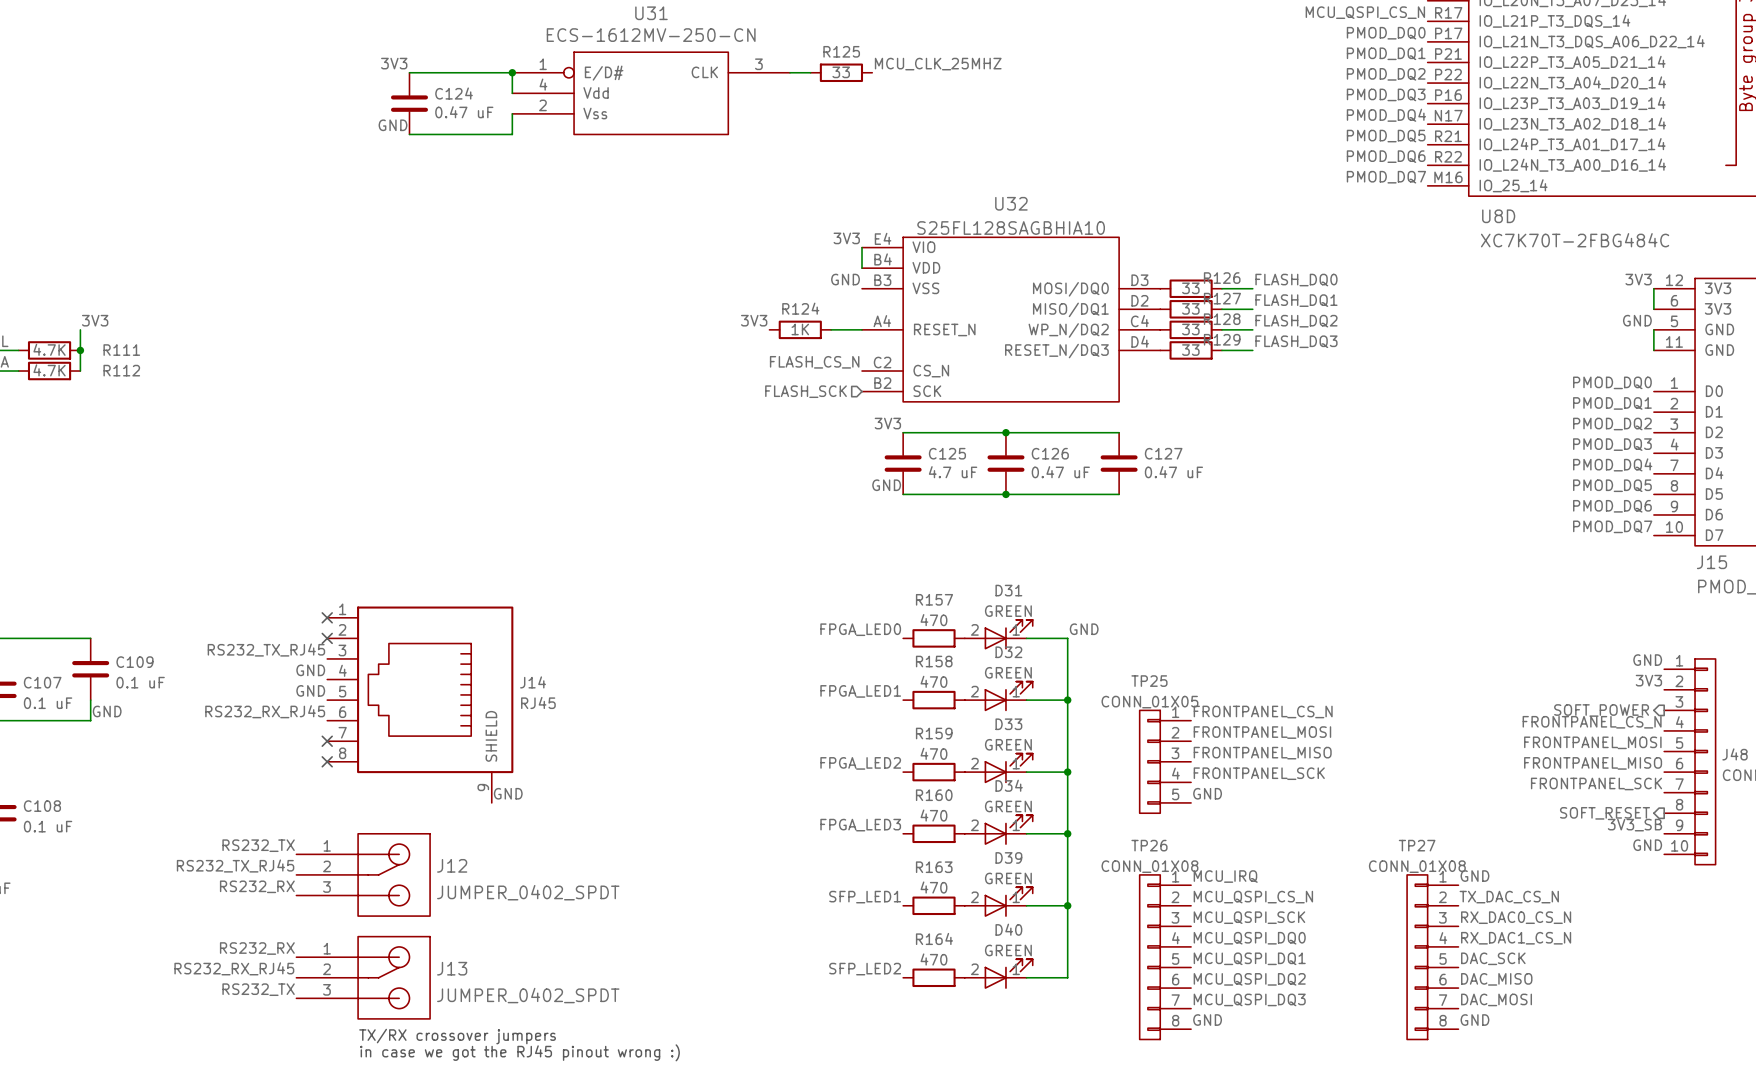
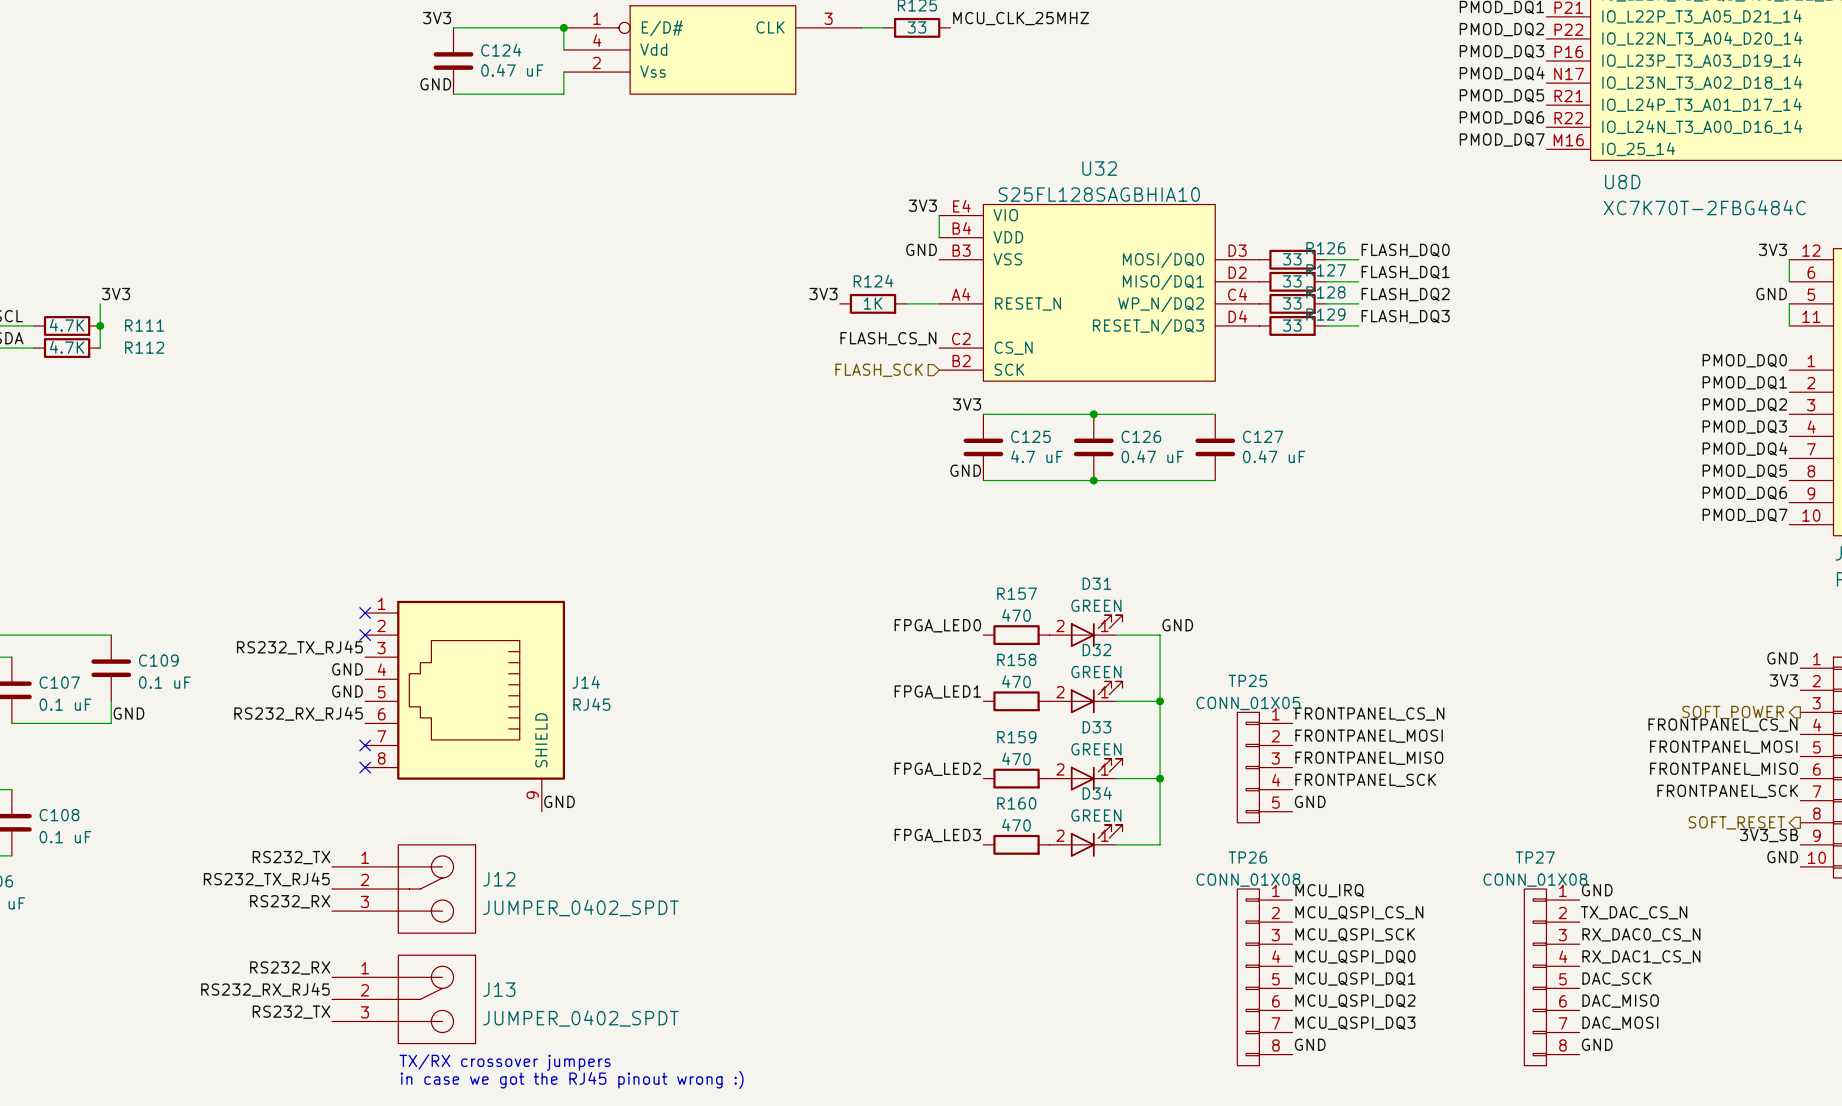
wire: (1067, 833) (1067, 977) (1026, 977) -> none
junction: (1067, 833) -> none
label: SFP_LED1 (865, 897) -> none
D39: GREEN (998, 902) -> none
R163: 470 (933, 905) -> none
wire: (1026, 905) (1067, 905) -> none
junction: (1067, 905) -> none
label: SFP_LED2 (865, 969) -> none
D40: GREEN (998, 974) -> none
R164: 470 (933, 977) -> none

